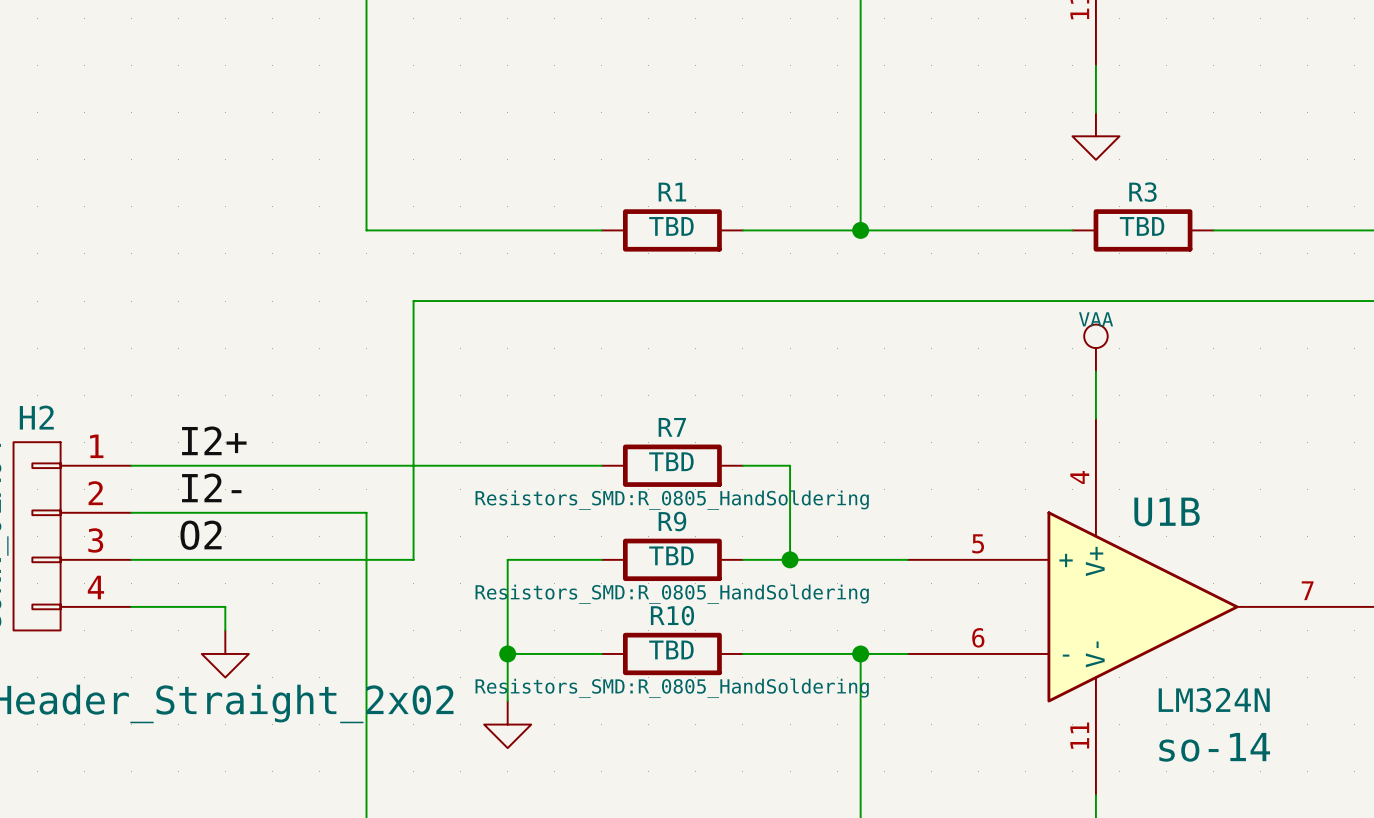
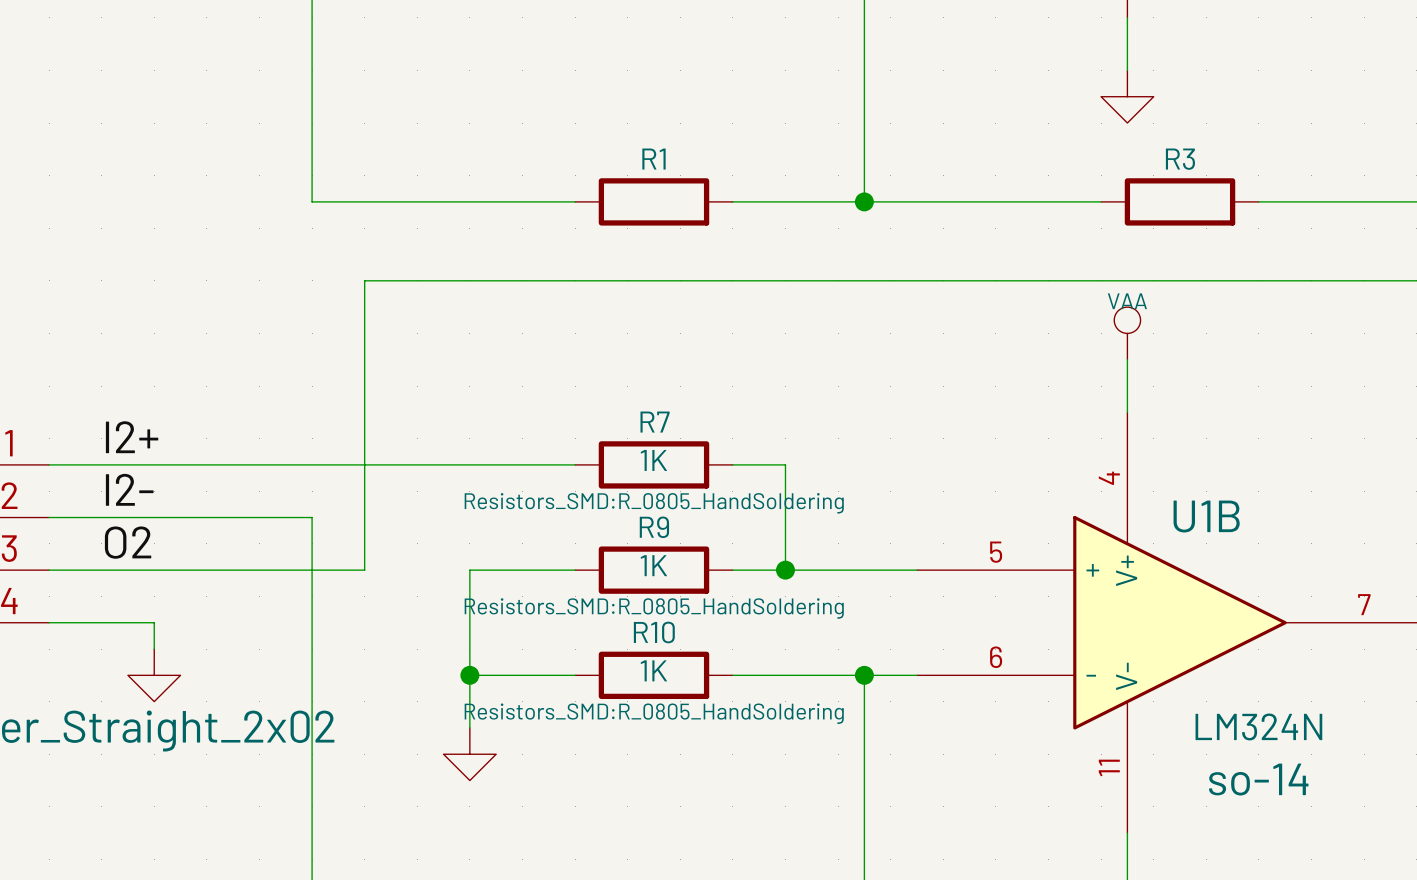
R1 value: TBD (671, 226) -> none
R3 value: TBD (1142, 226) -> none
R7 value: TBD (671, 461) -> 1K (653, 460)
R9 value: TBD (671, 555) -> 1K (653, 565)
R10 value: TBD (671, 649) -> 1K (653, 670)

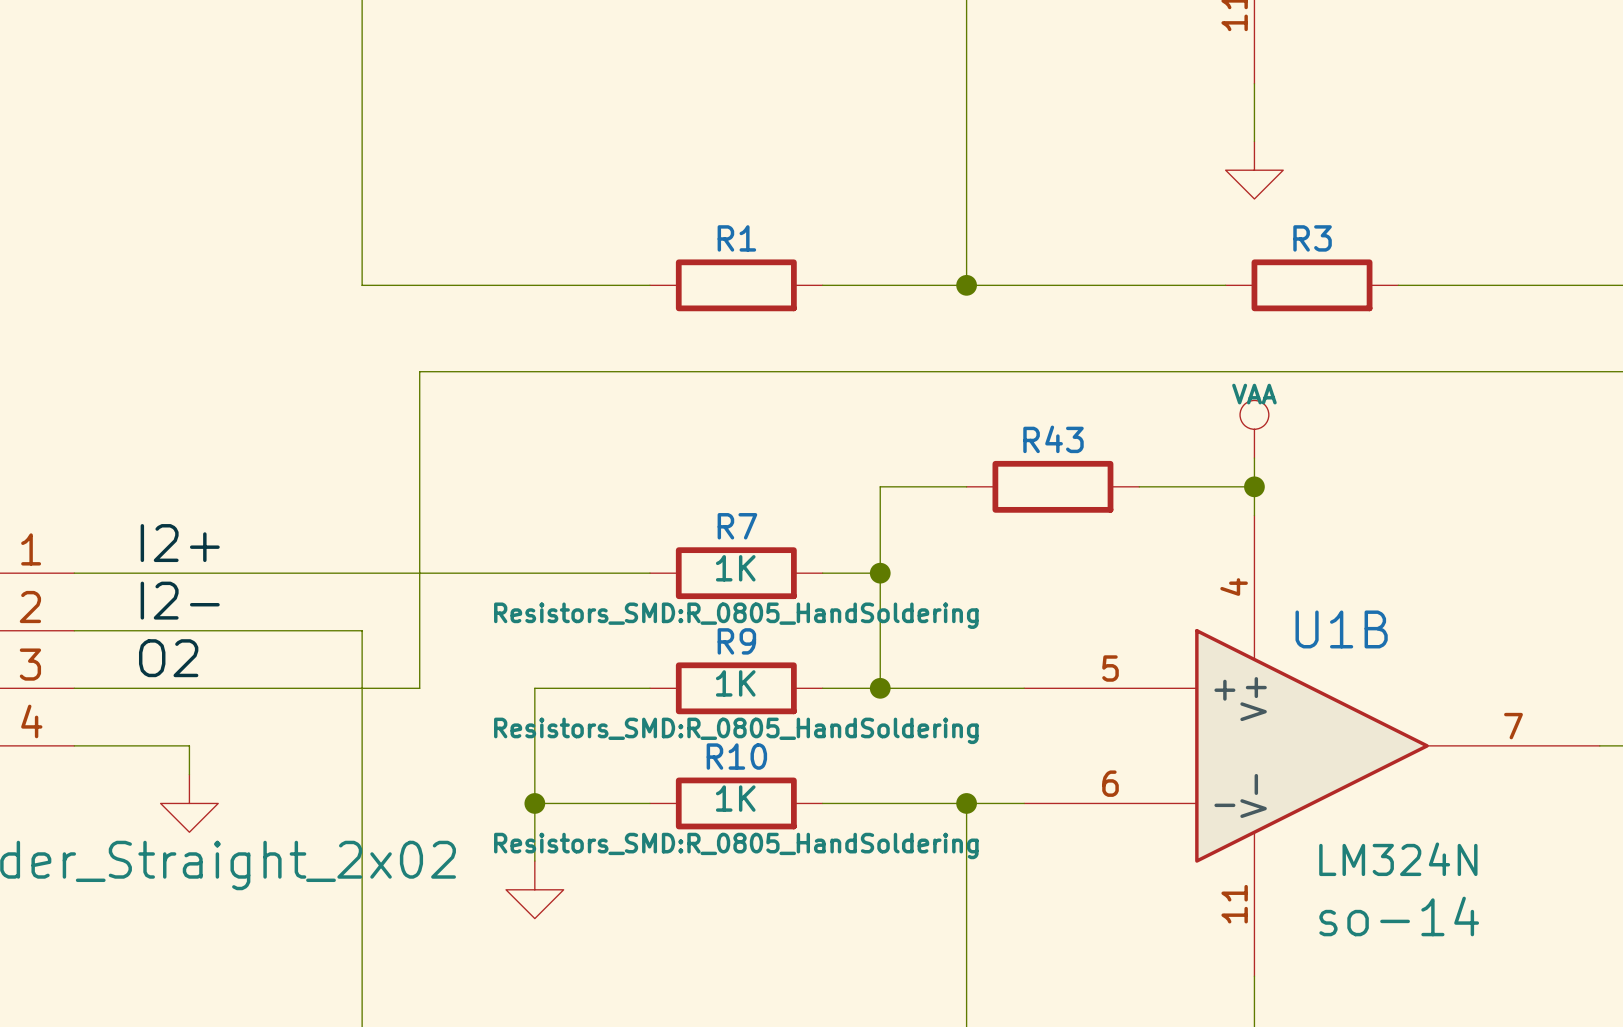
wire: none -> (966, 486) (880, 486) (880, 573)
R43: none -> (1052, 486)
wire: none -> (1139, 486) (1254, 486)
junction: none -> (1254, 486)
junction: none -> (880, 573)

